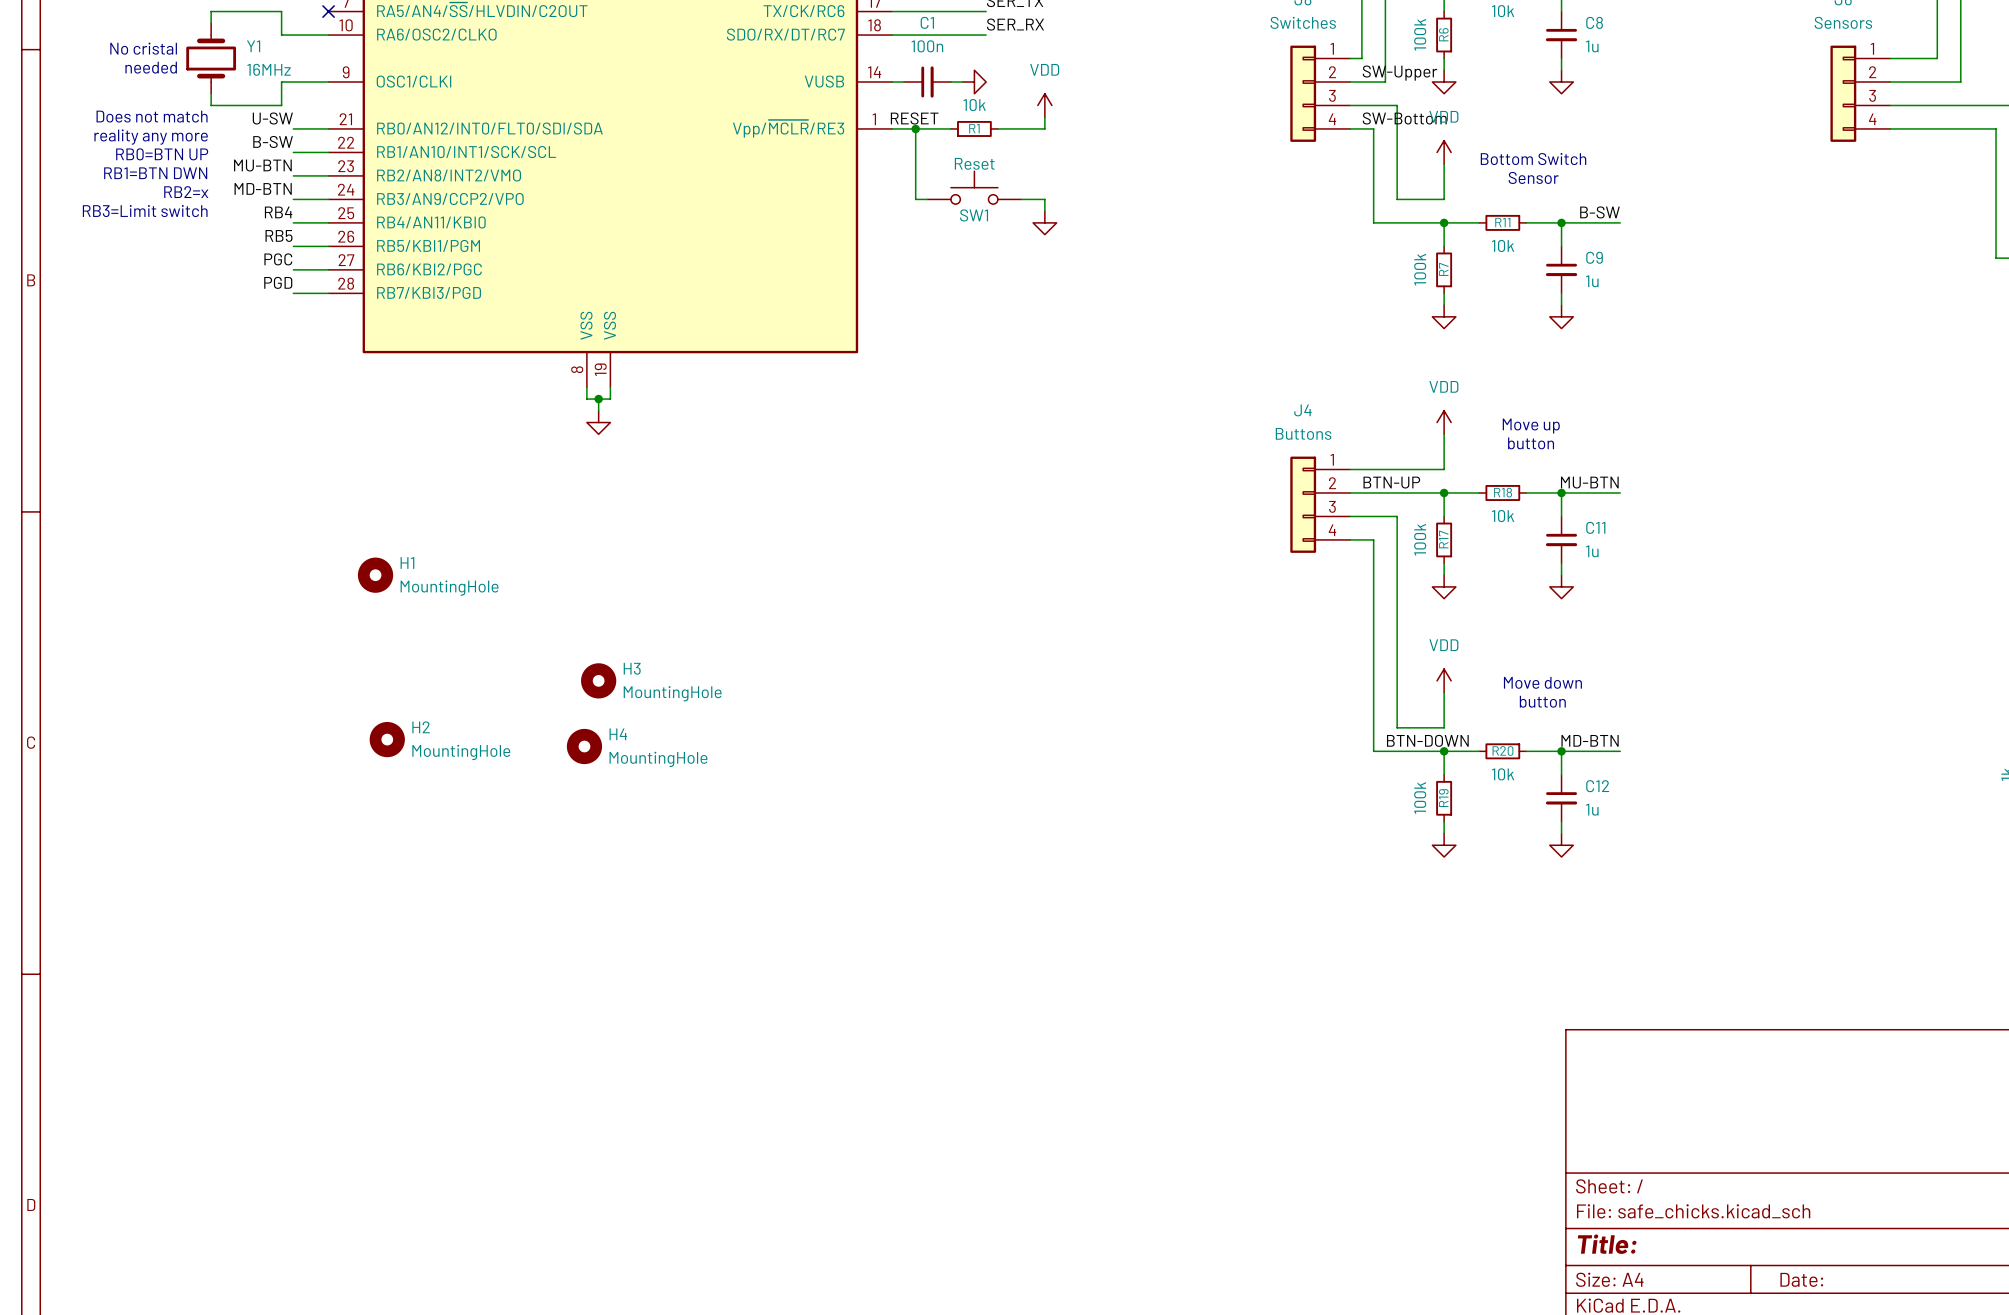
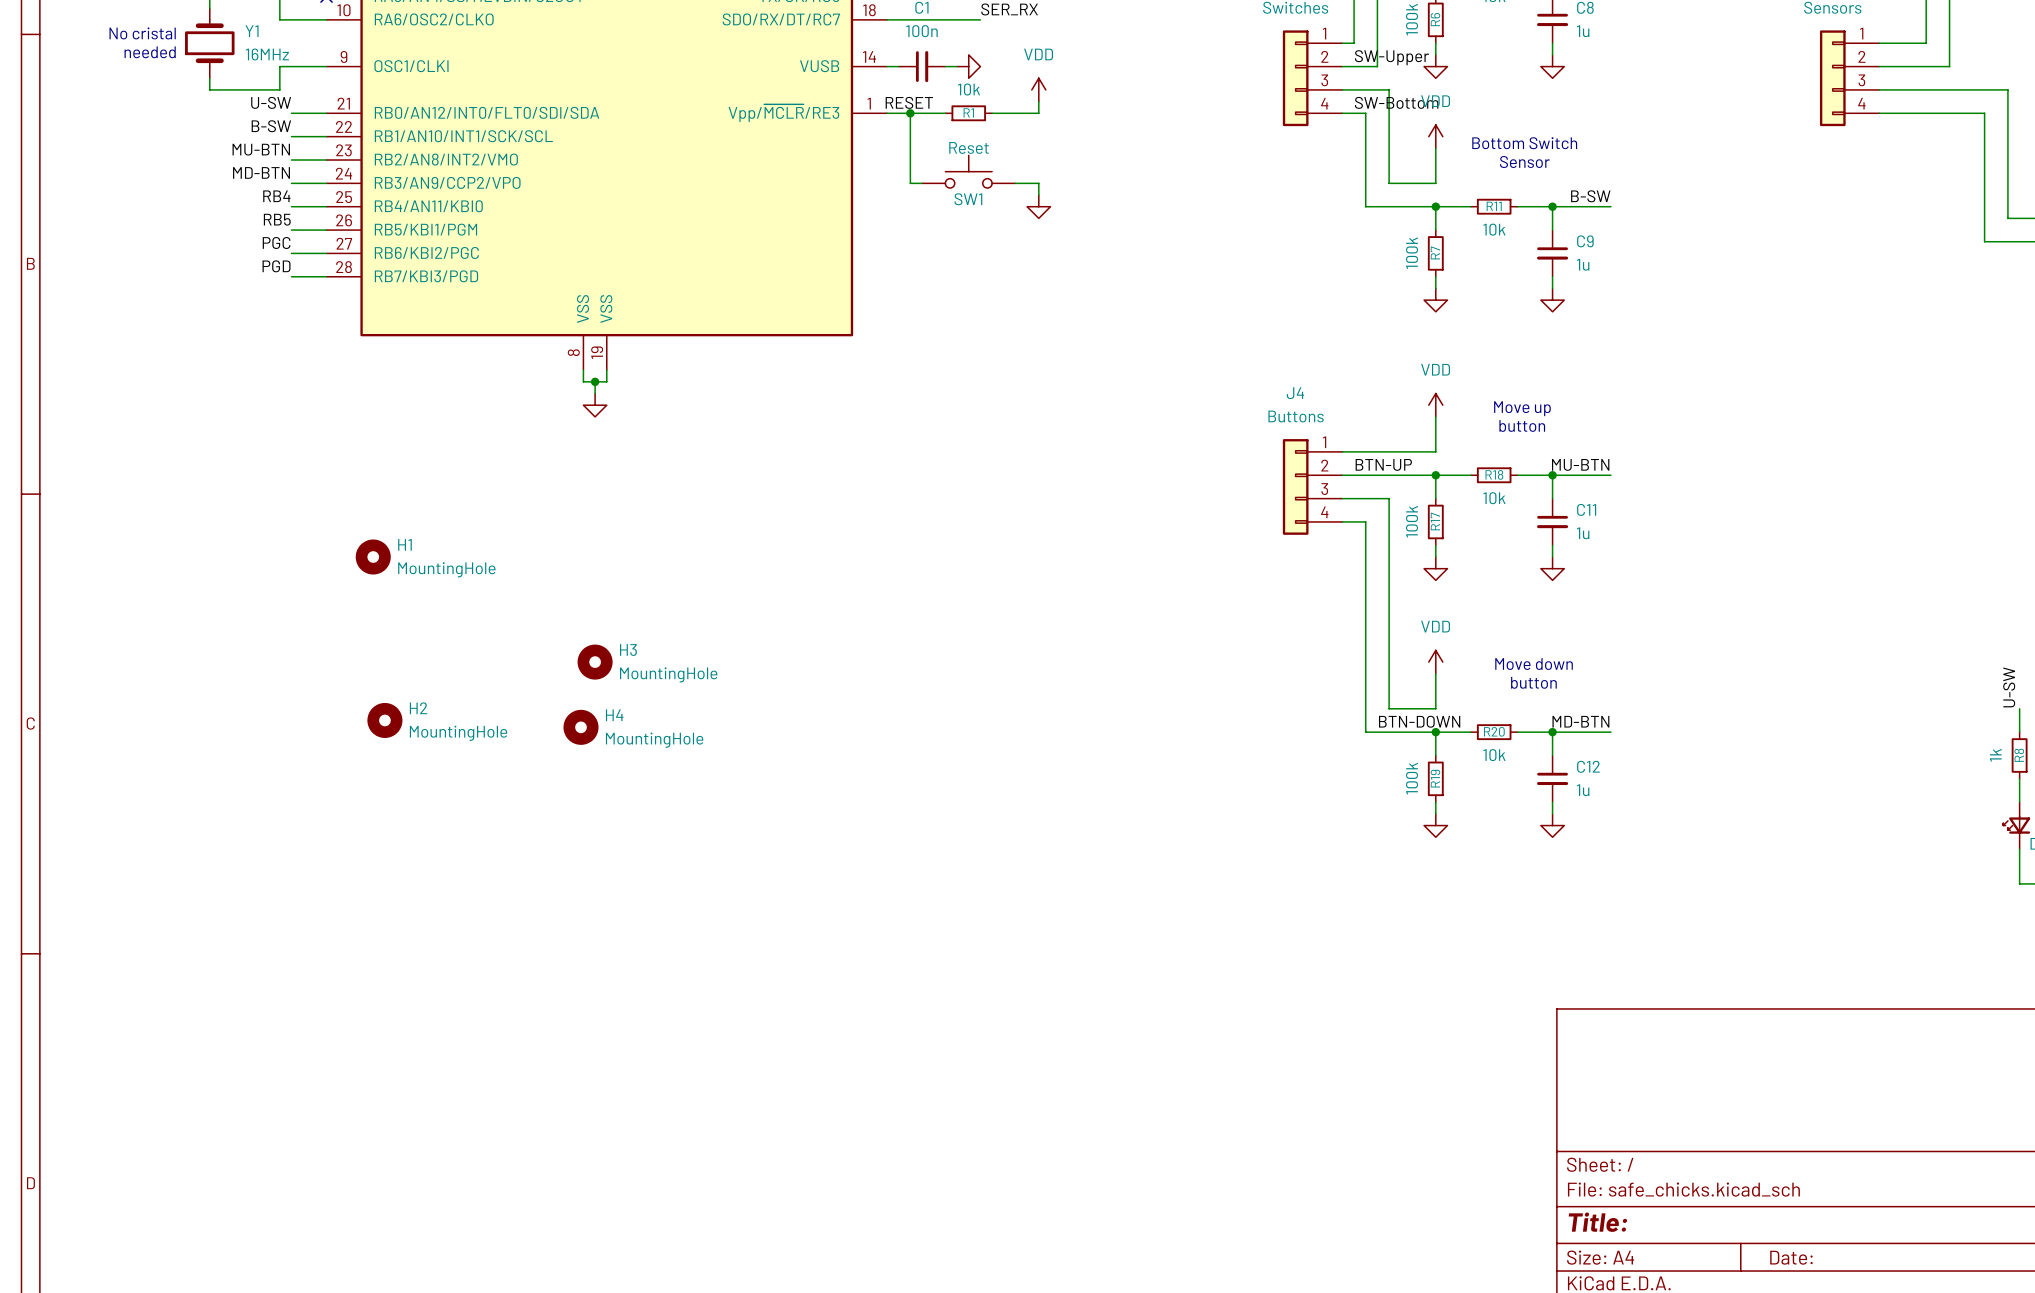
text: Does not match (152, 116) -> none
text: reality any more (151, 137) -> none
text: RB0=BTN UP (162, 154) -> none
text: RB1=BTN DWN (155, 173) -> none
text: RB2=x (186, 192) -> none
text: RB3=Limit switch (145, 211) -> none

